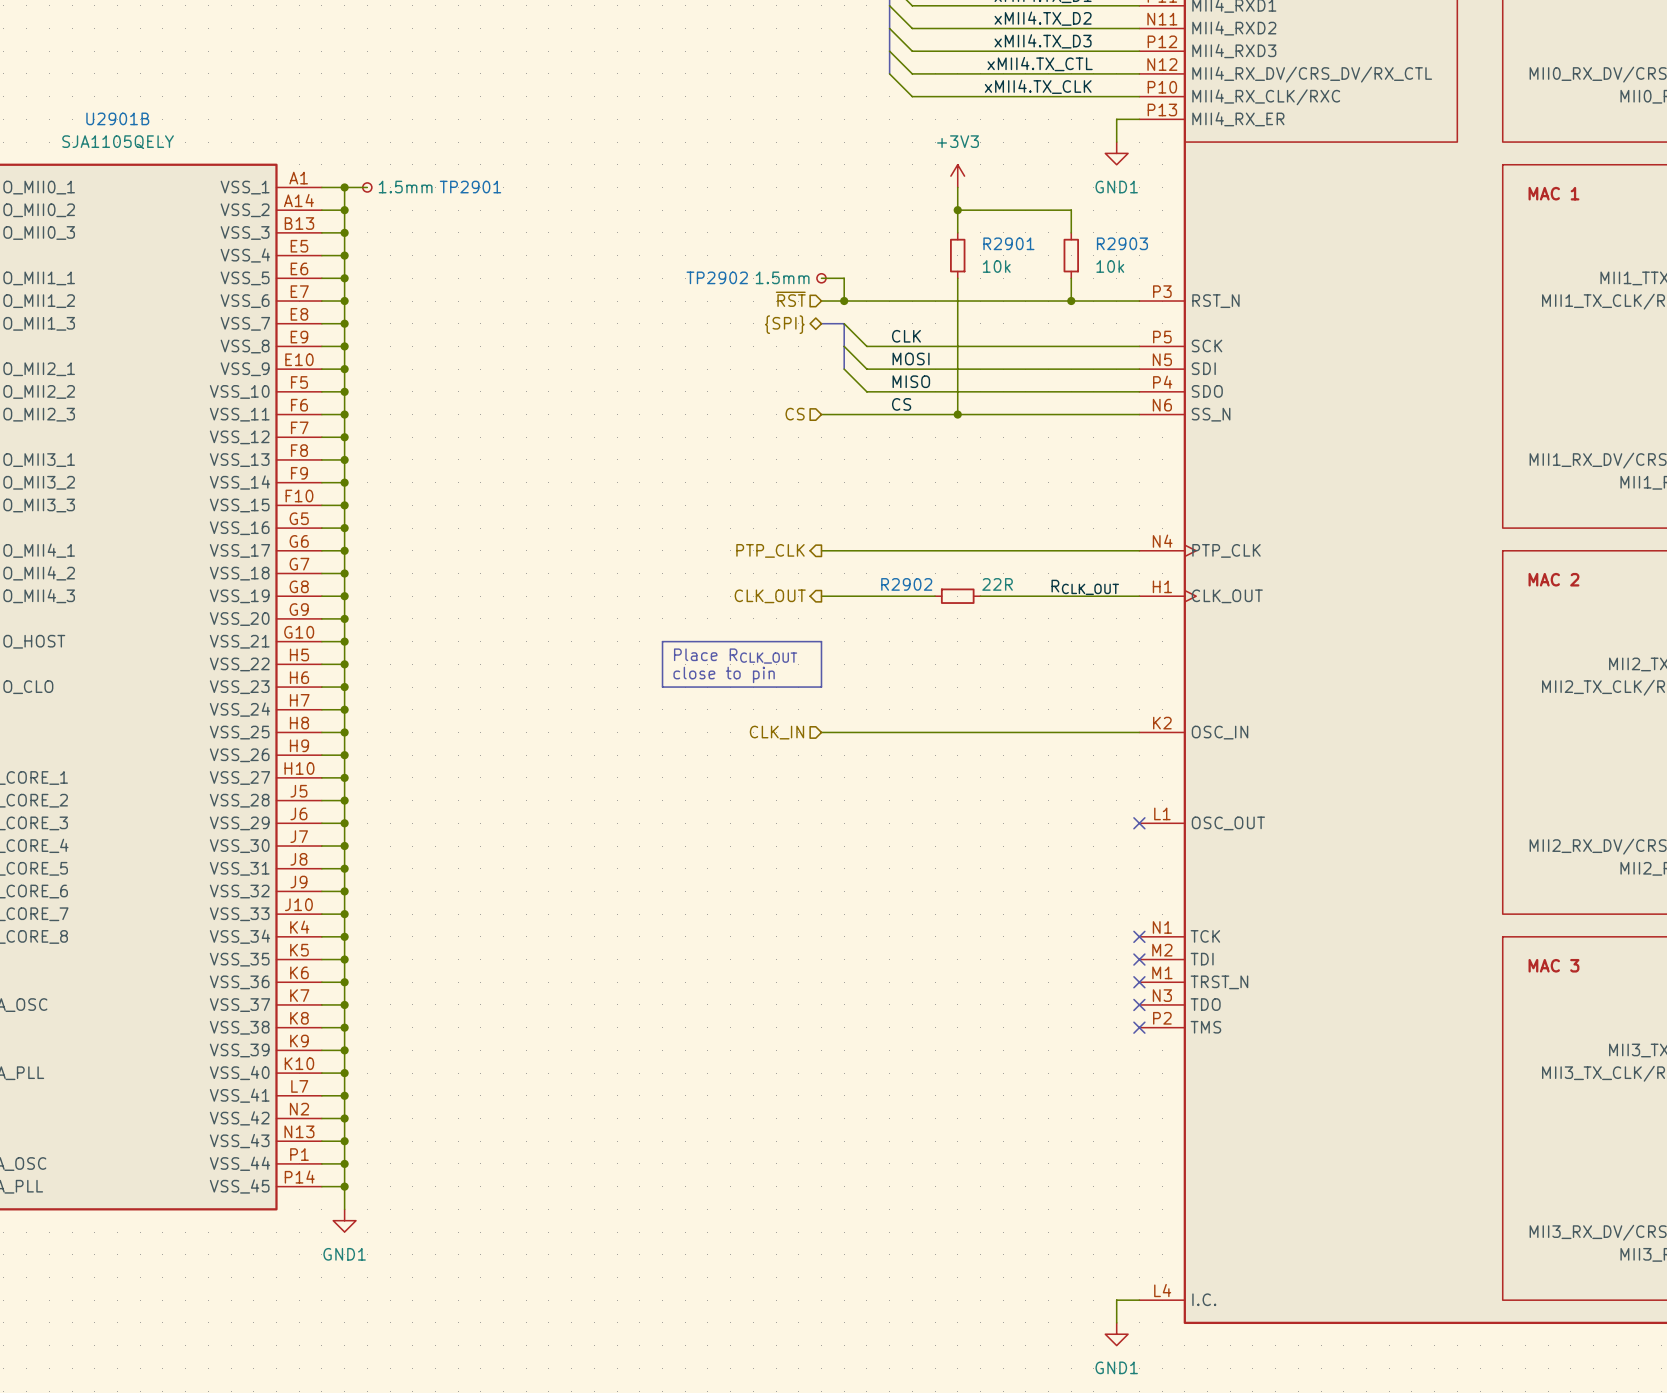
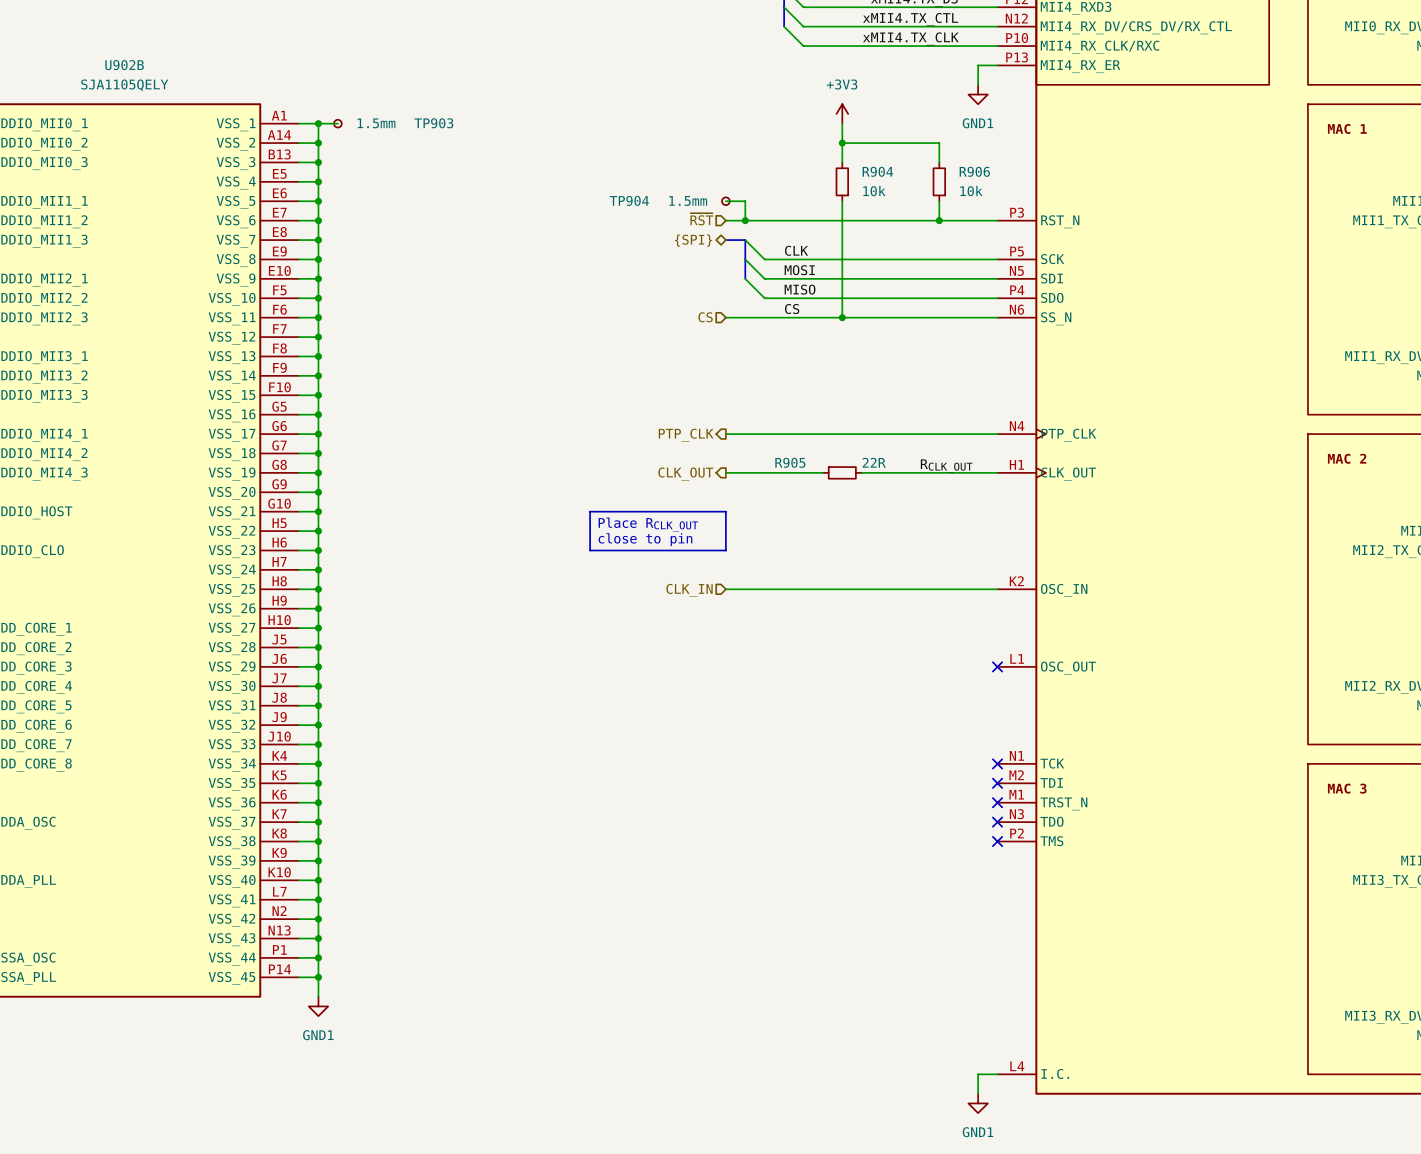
U2901B name: U2901B (117, 118) -> U902B (124, 65)
TP2901 name: TP2901 (470, 187) -> TP903 (433, 123)
R2901 name: R2901 (1008, 243) -> R904 (877, 171)
R2903 name: R2903 (1122, 243) -> R906 (974, 171)
TP2902 name: TP2902 (717, 277) -> TP904 (629, 200)
R2902 name: R2902 (906, 584) -> R905 (790, 462)

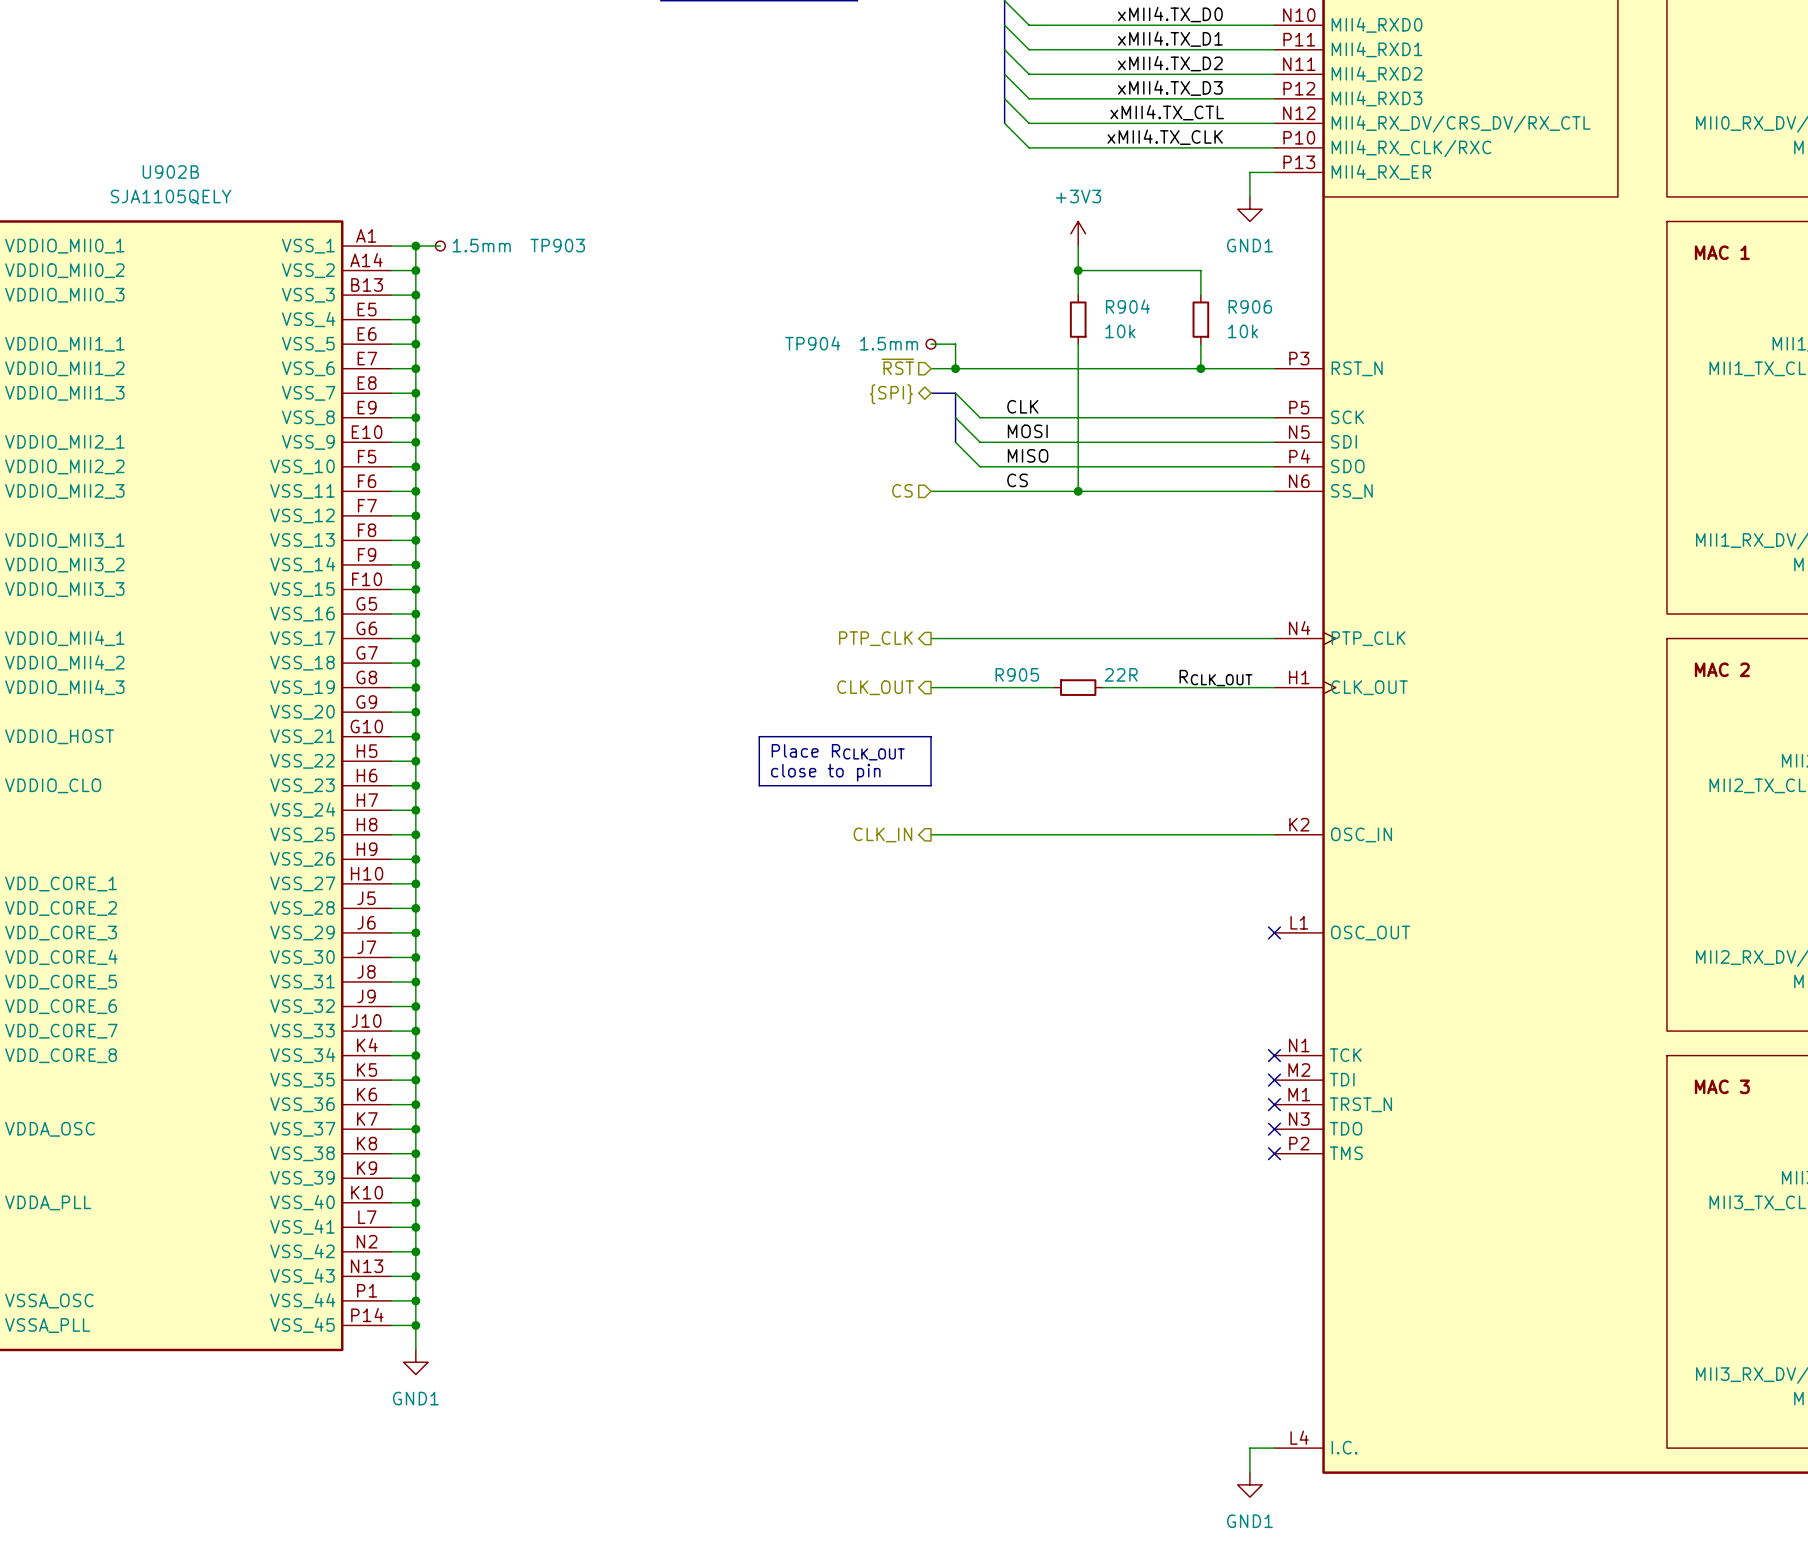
hierarchical label shape: input (689, 590) -> output (882, 834)

